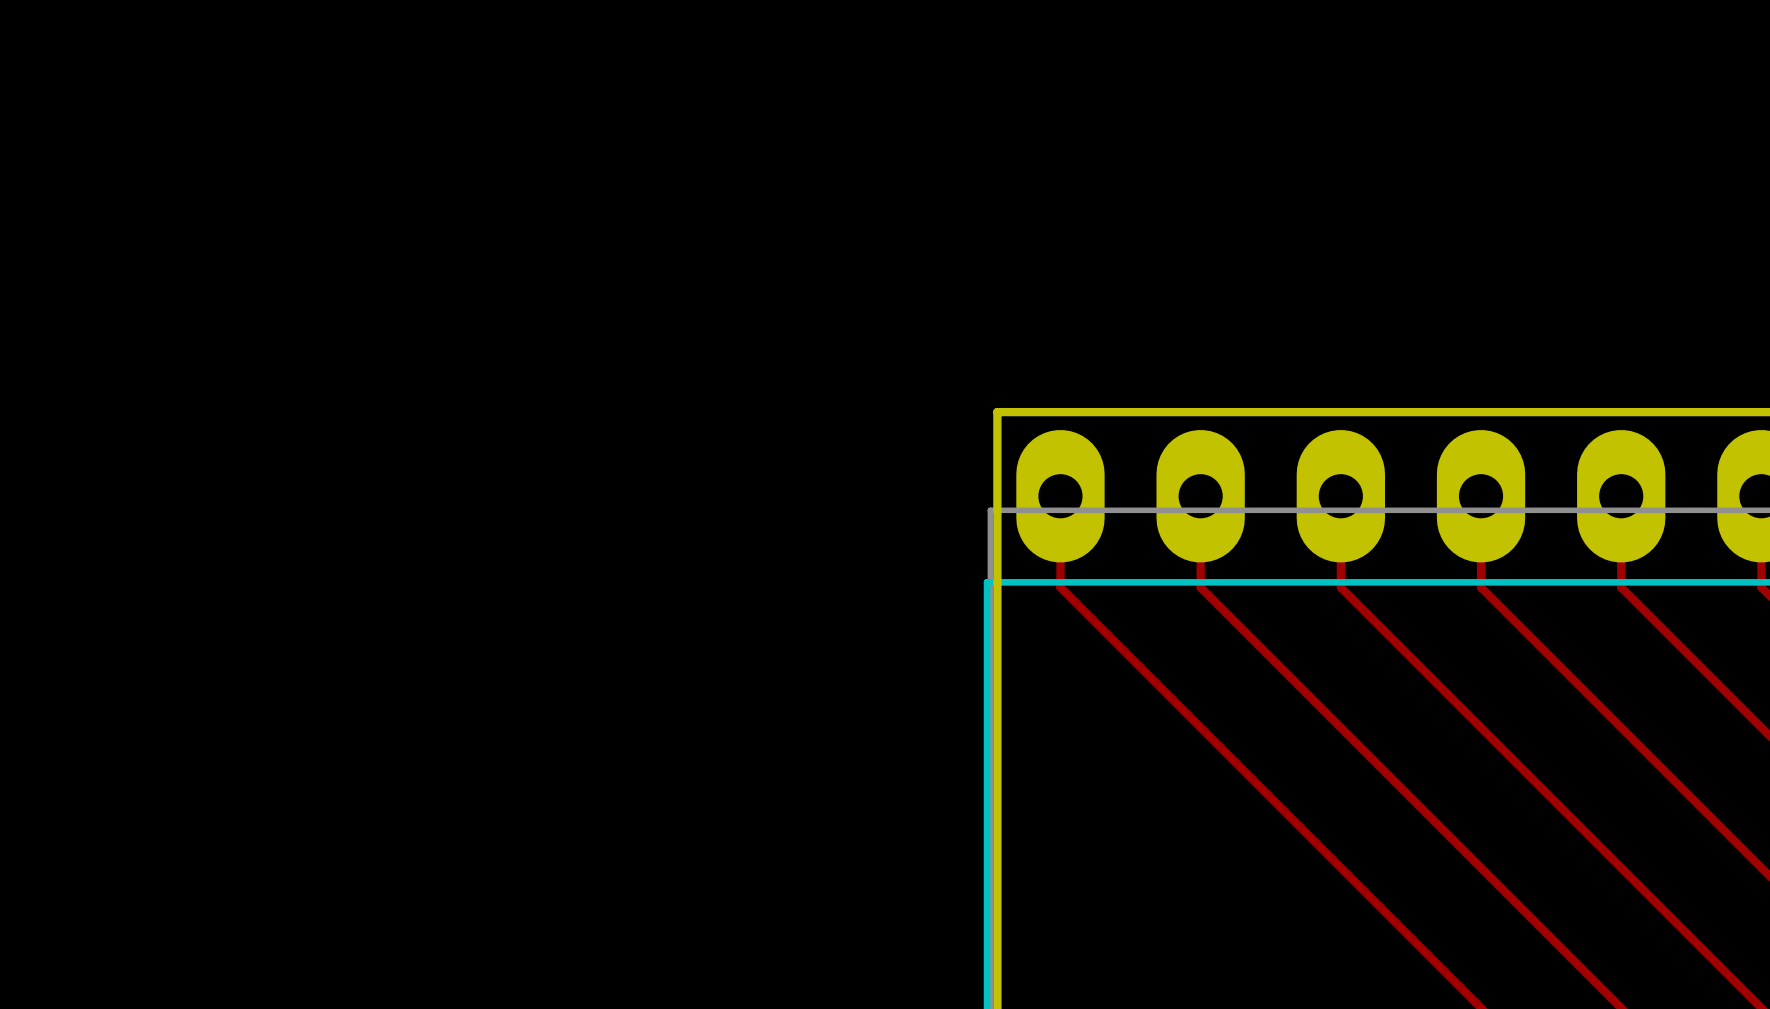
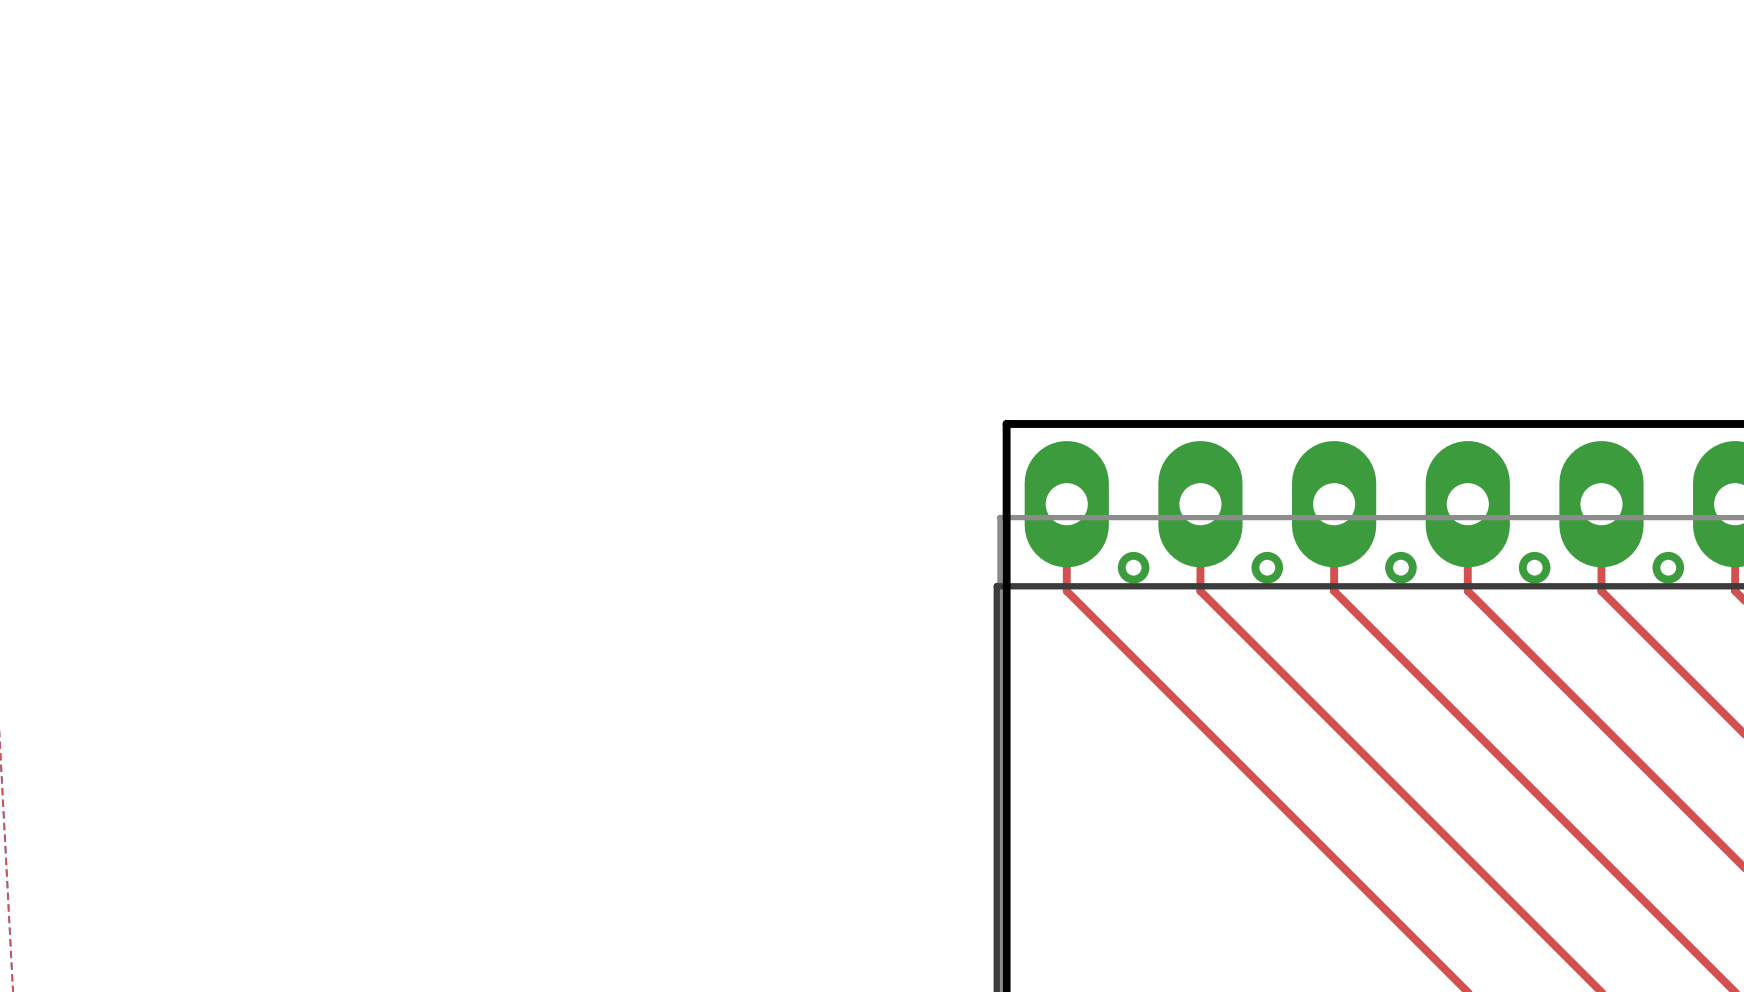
via: none -> (1133, 567)
via: none -> (1267, 567)
via: none -> (1400, 567)
via: none -> (1534, 567)
via: none -> (1668, 567)

